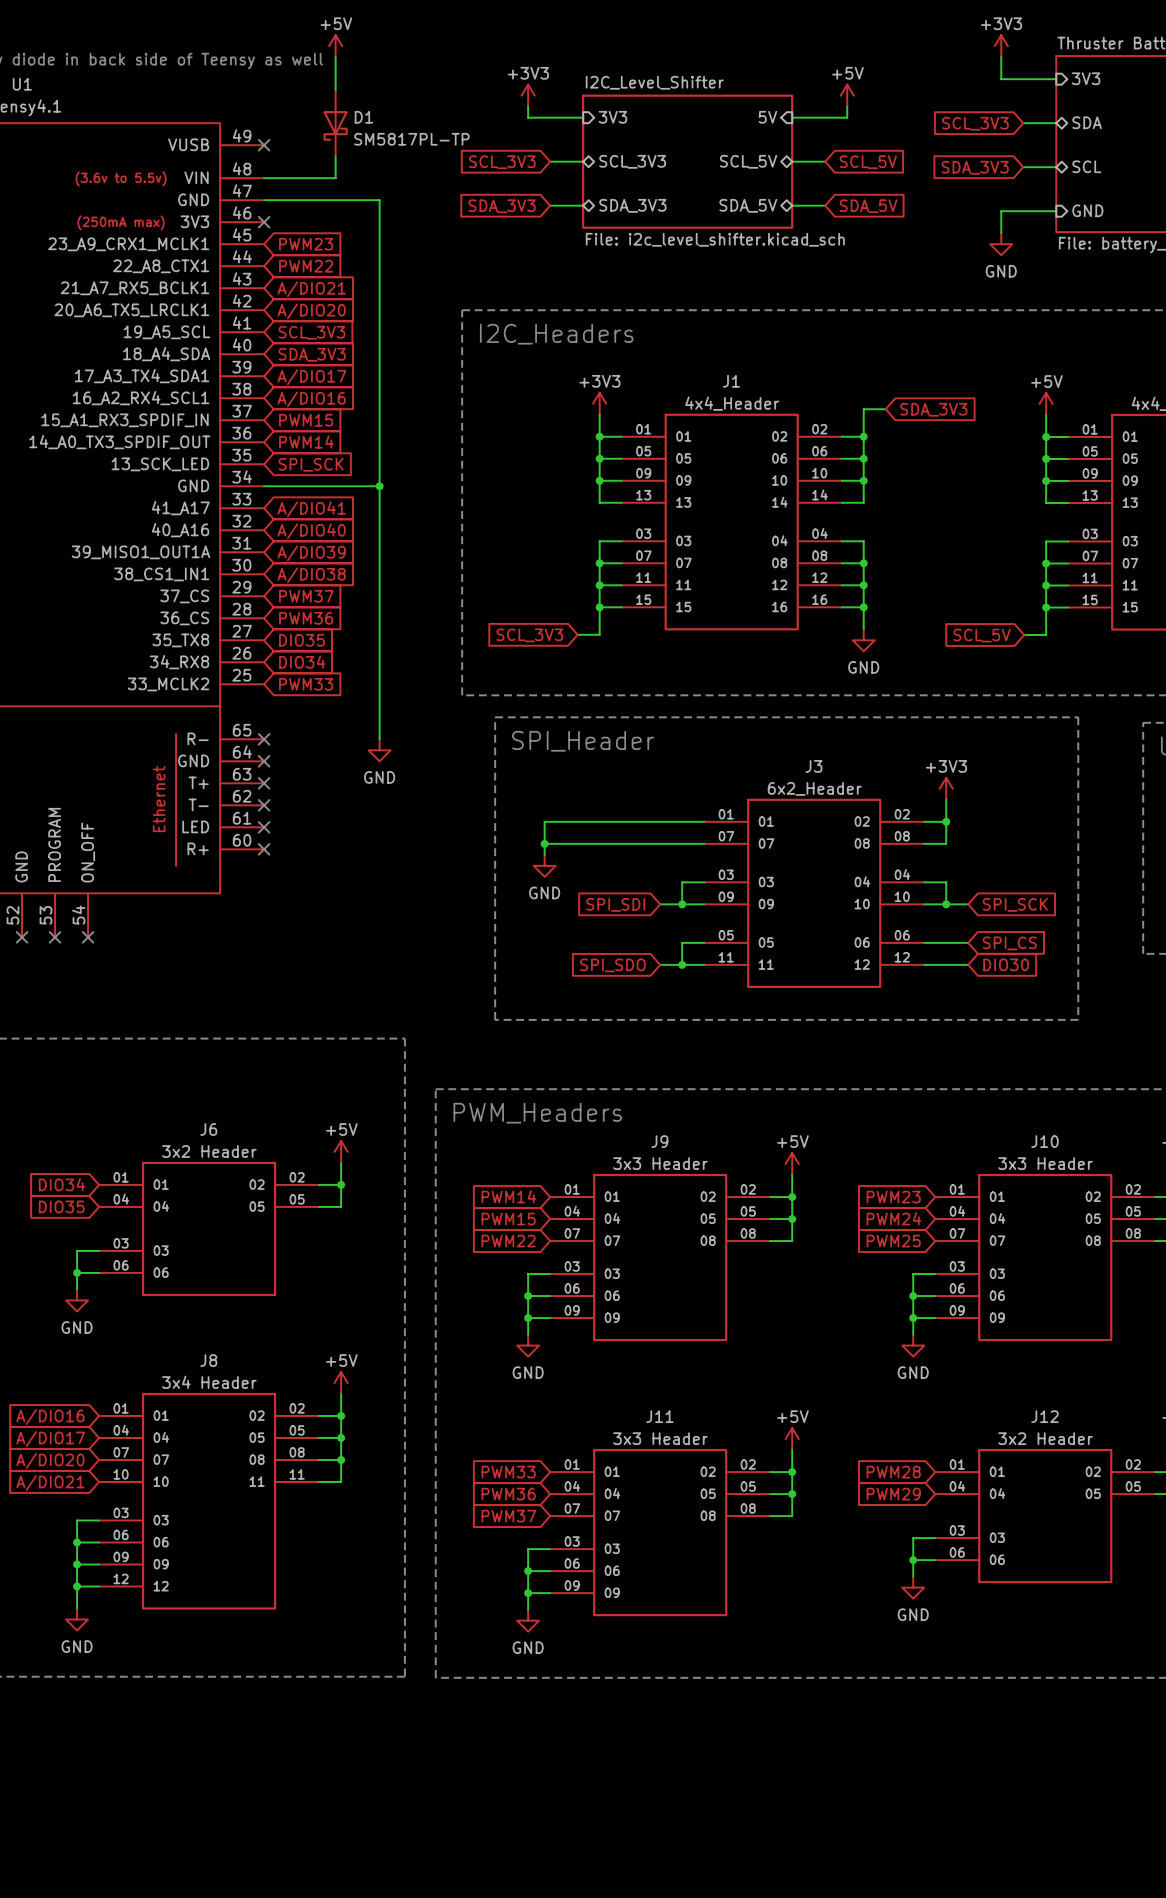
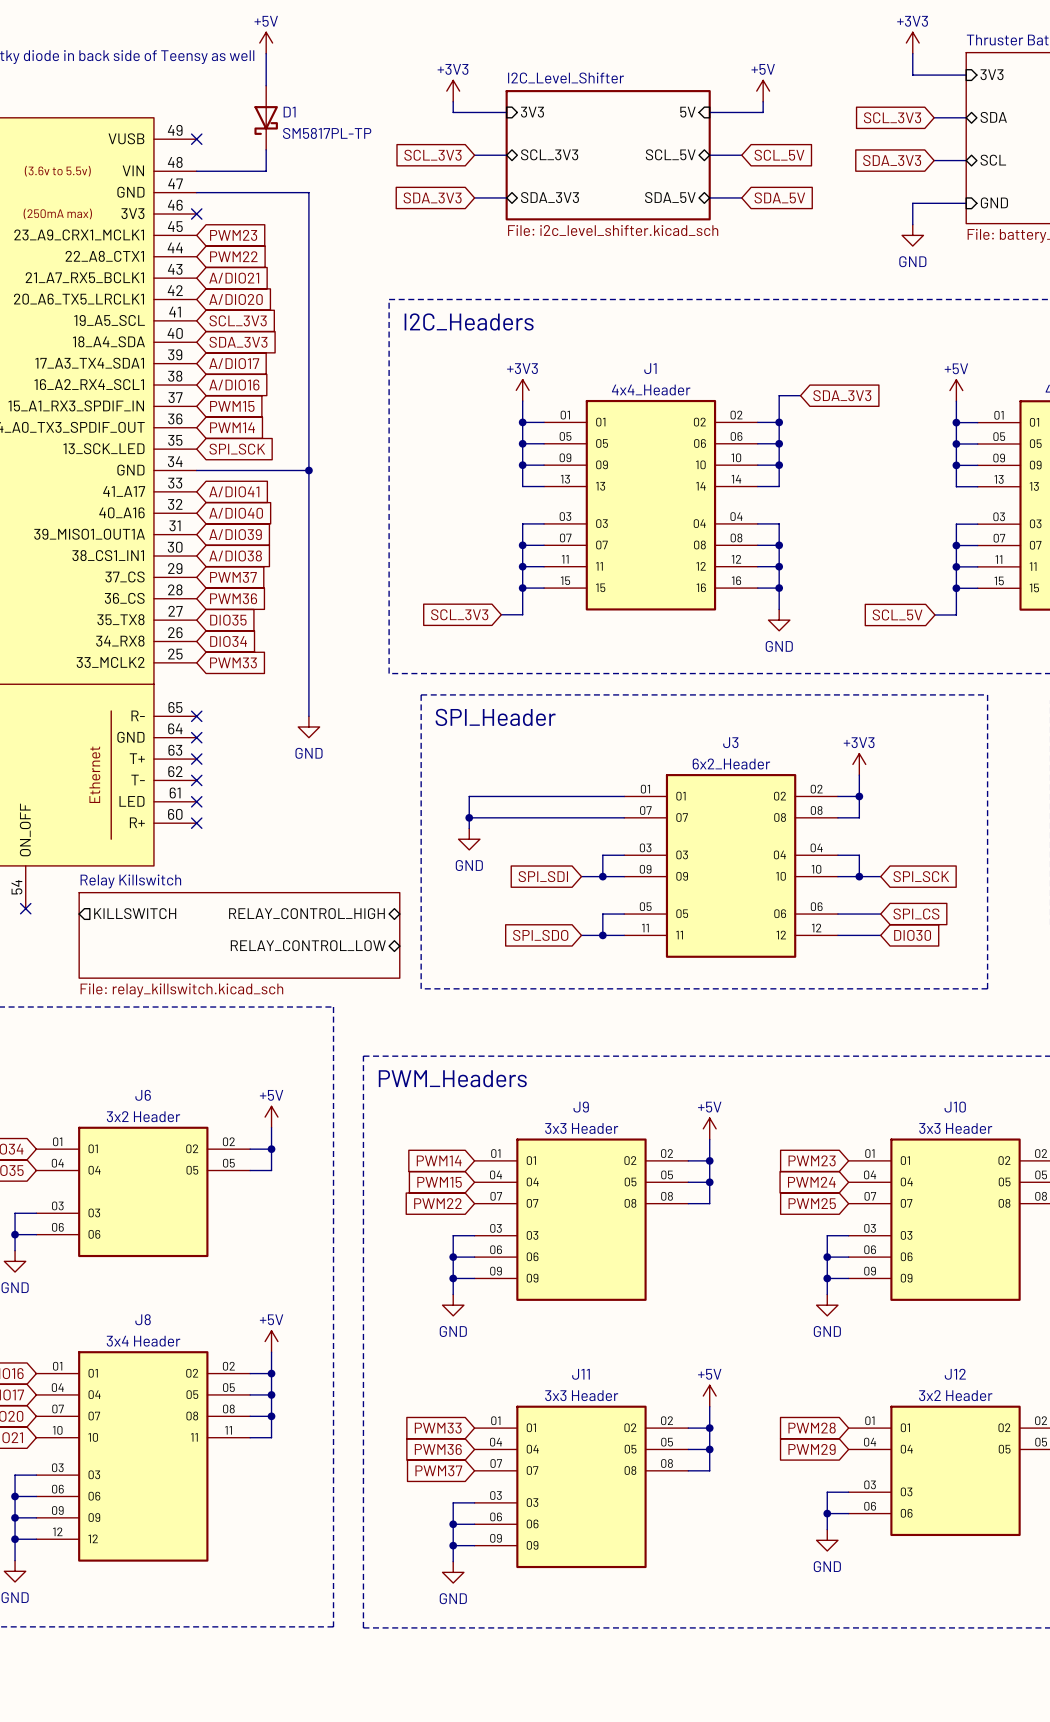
sheet pin: none -> KILLSWITCH (135, 913)
sheet pin: none -> RELAY_CONTROL_HIGH (306, 913)
sheet Relay Killswitch: none -> File: relay_killswitch.kicad_sch (239, 935)
sheet pin: none -> RELAY_CONTROL_LOW (308, 945)

